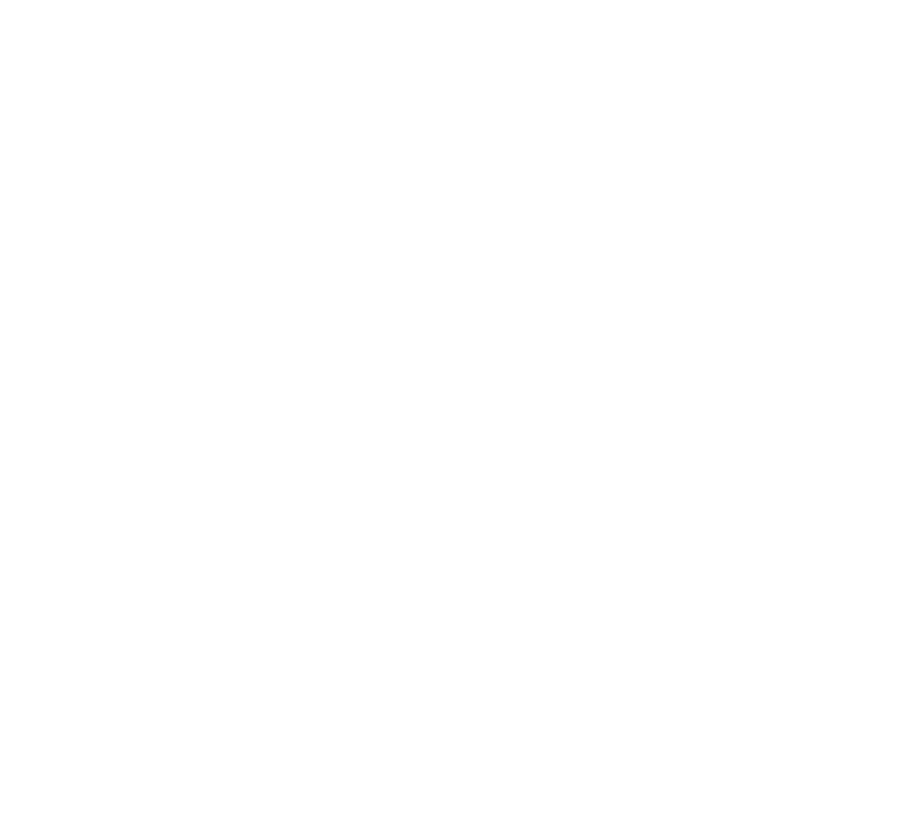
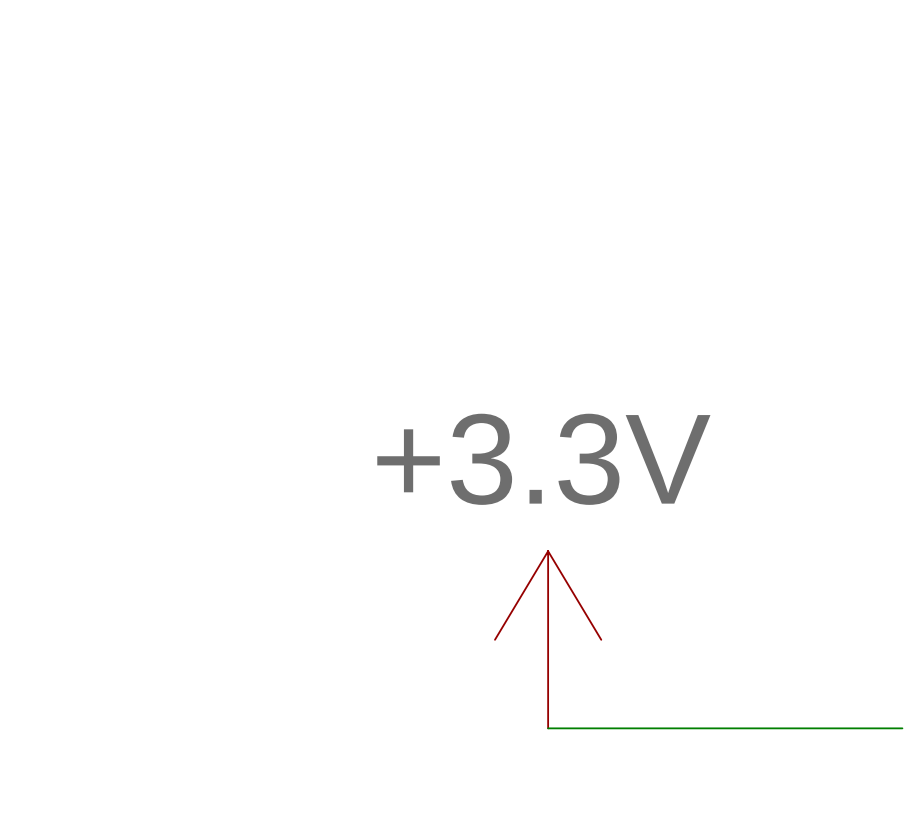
power symbol: none -> +3.3V (548, 639)
wire: none -> (548, 728) (902, 728)

